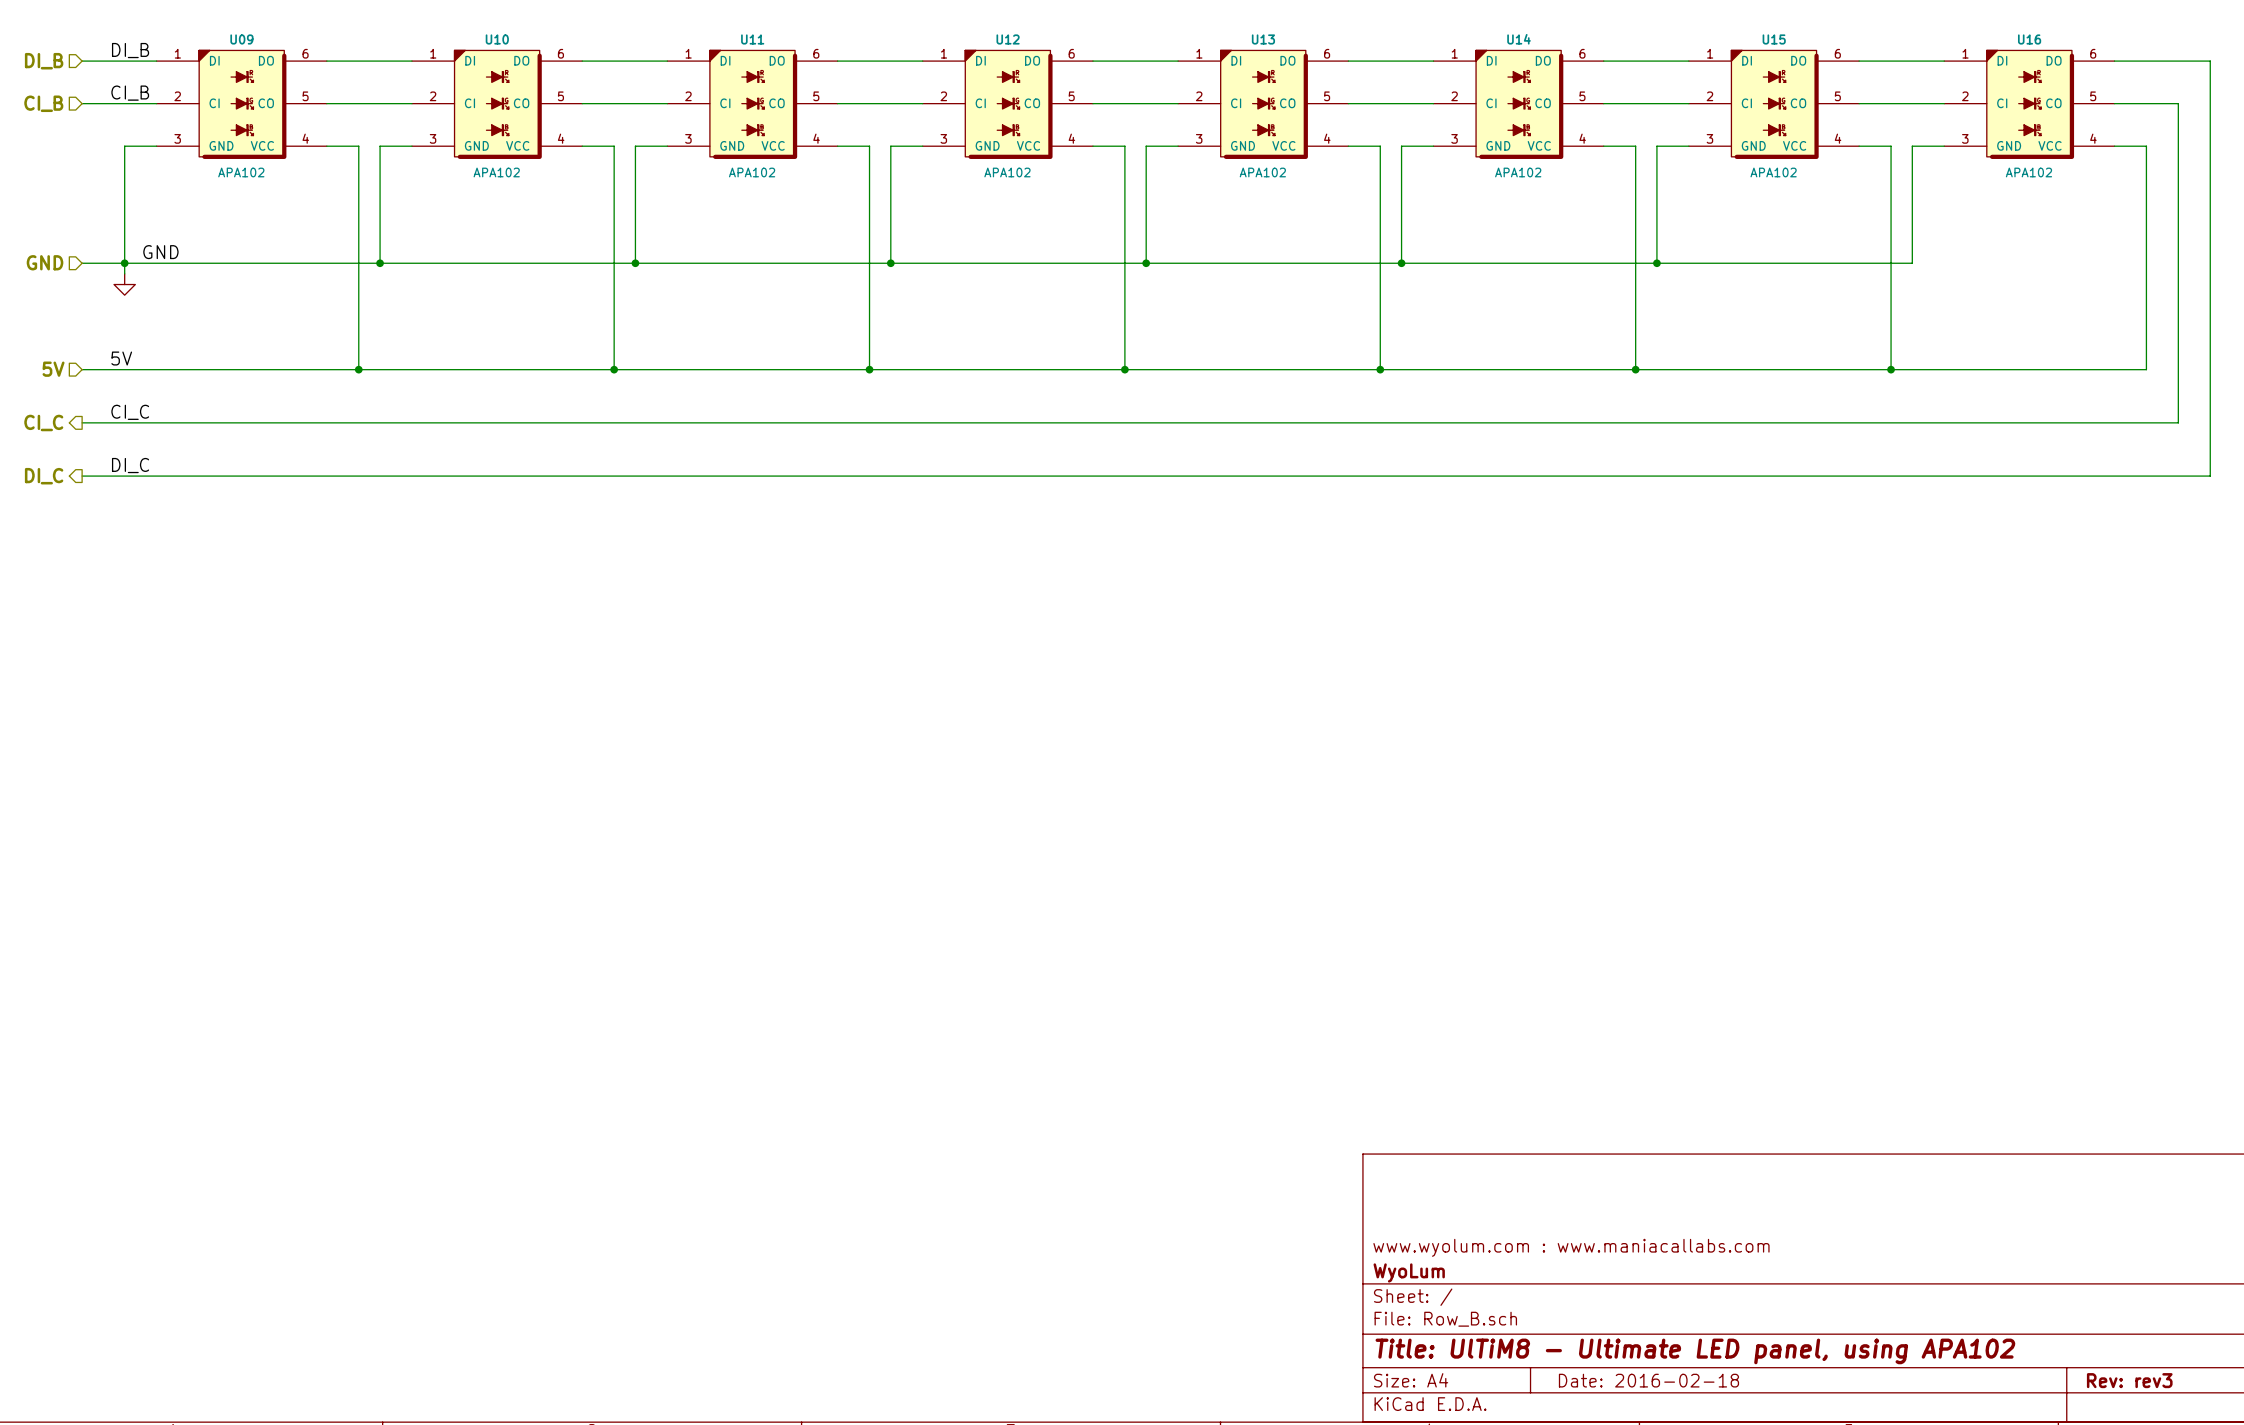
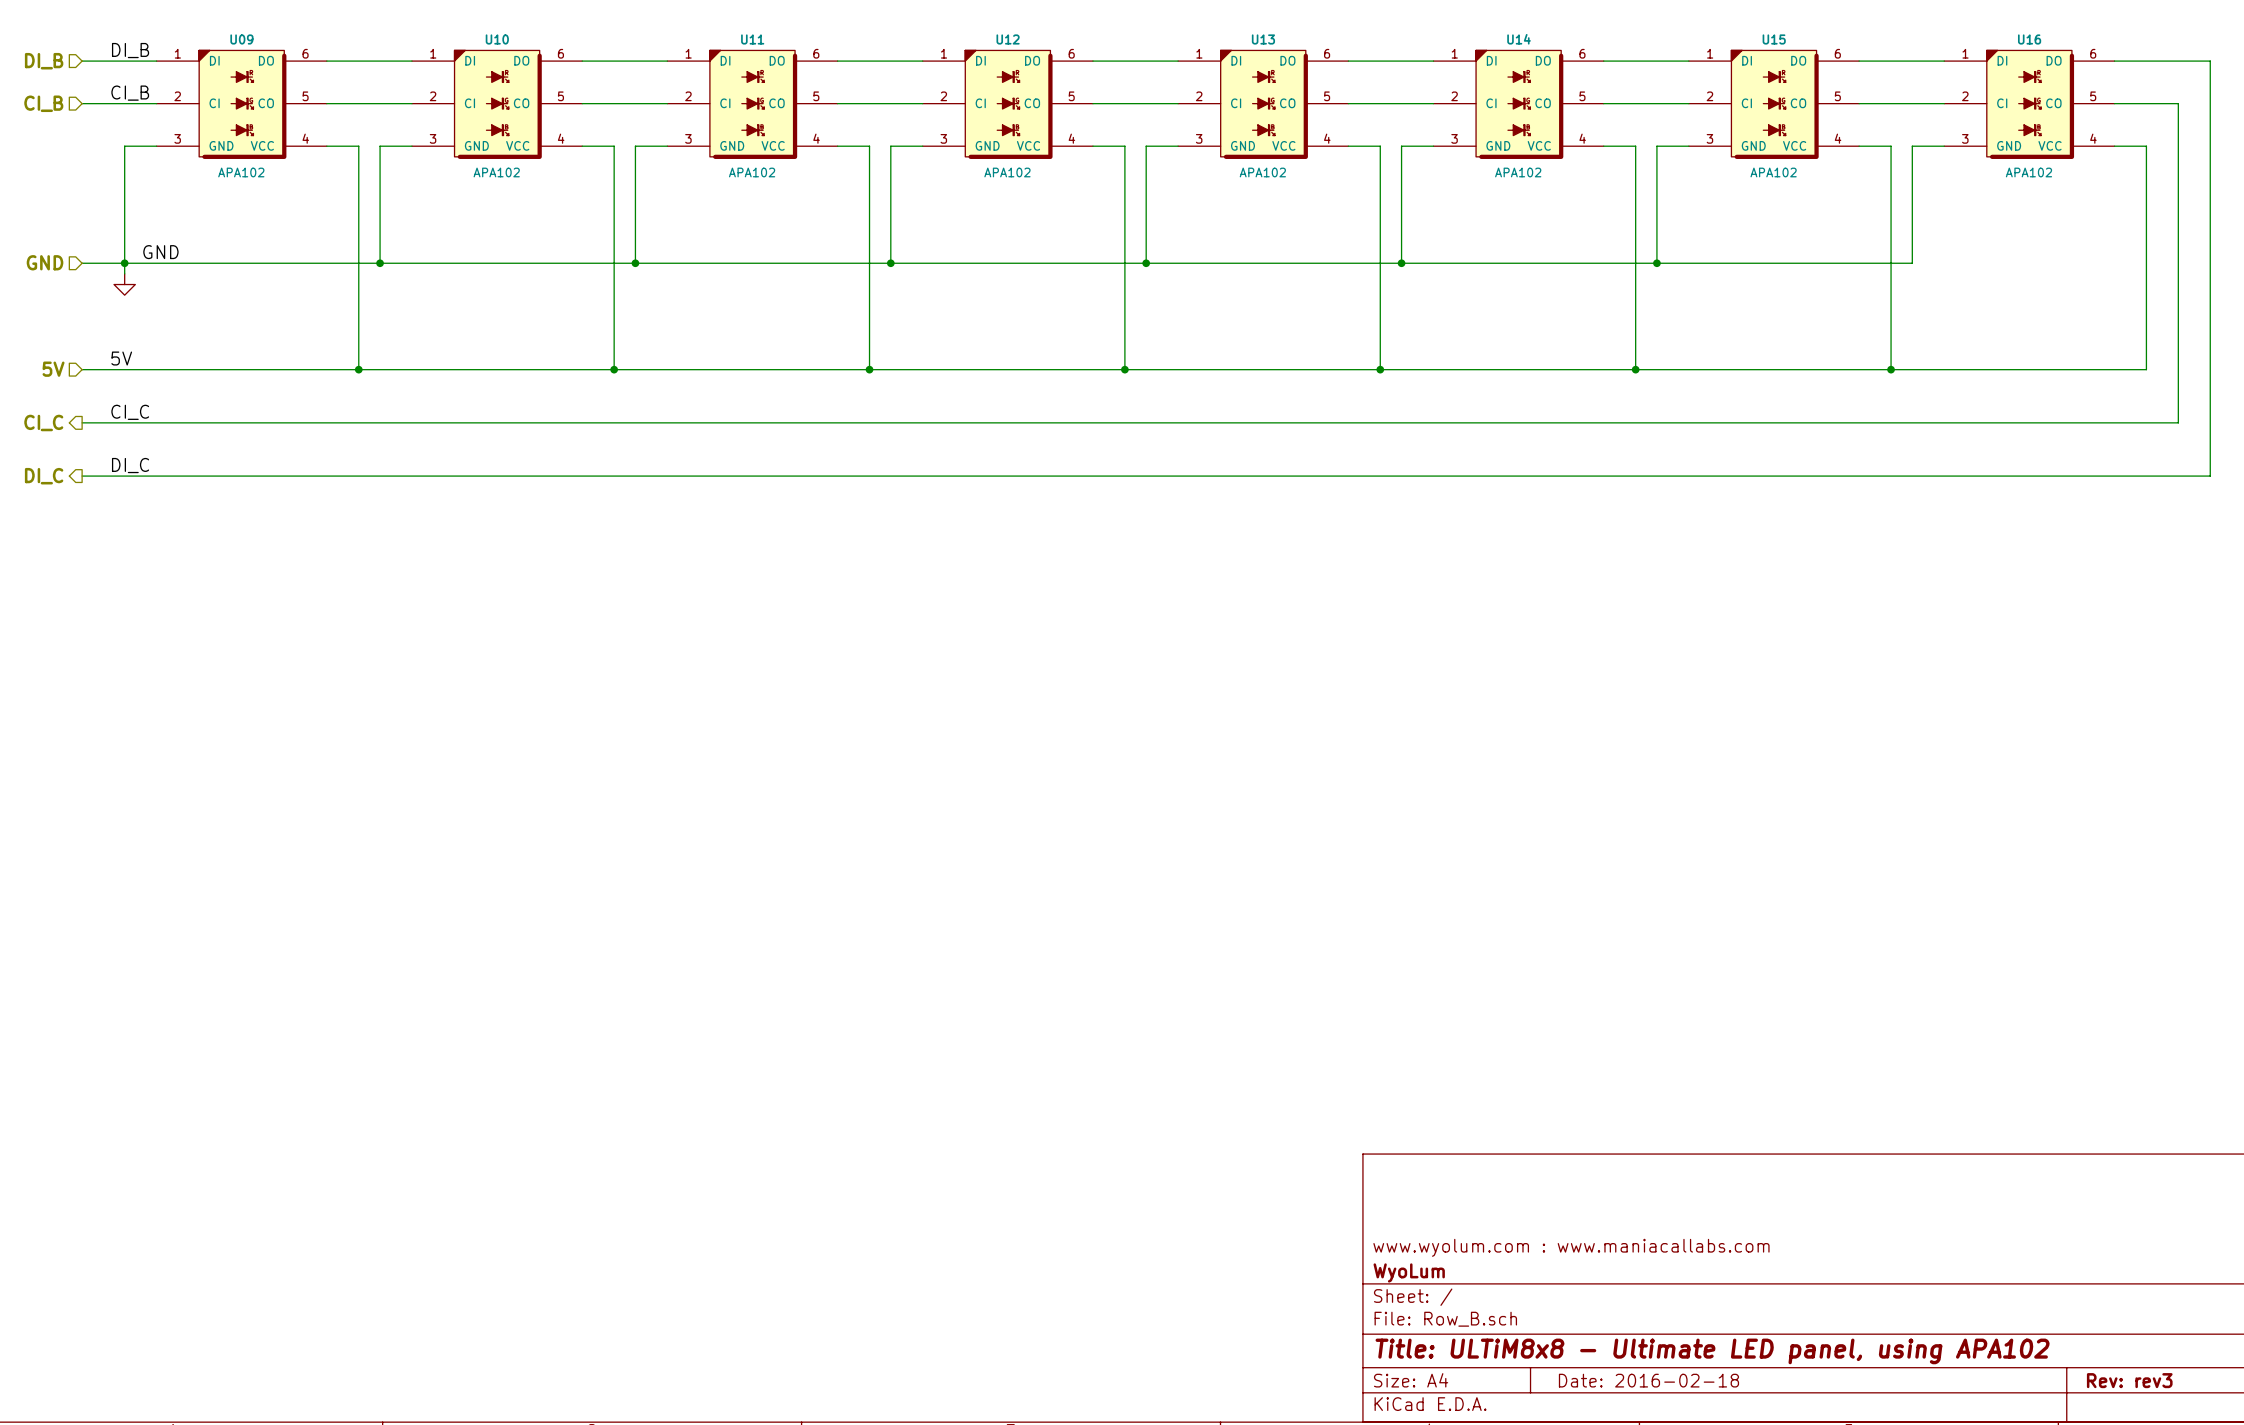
title block: Title: UlTiM8 - Ultimate LED panel, using APA102 (1695, 1351) -> Title: ULTiM8x8 - Ultimate LED panel, using APA102 (1712, 1351)

